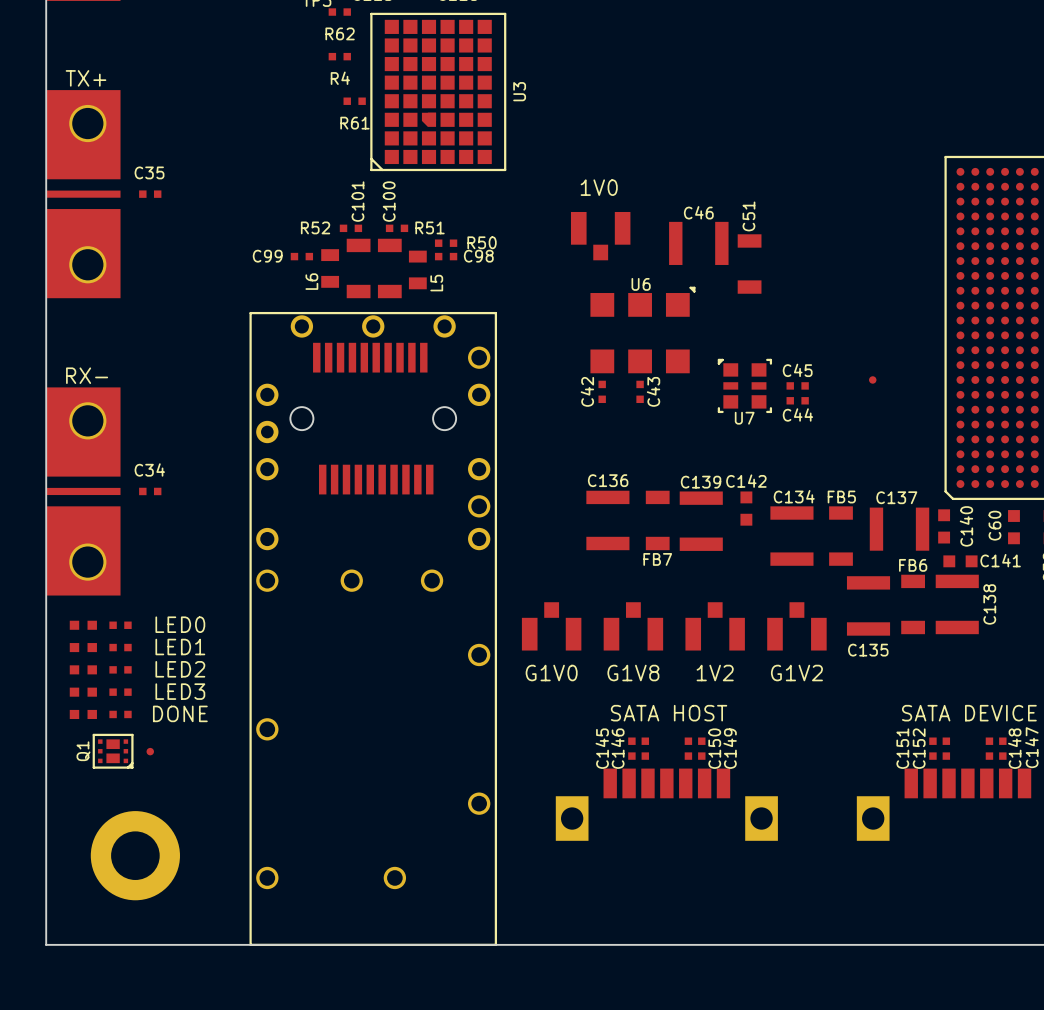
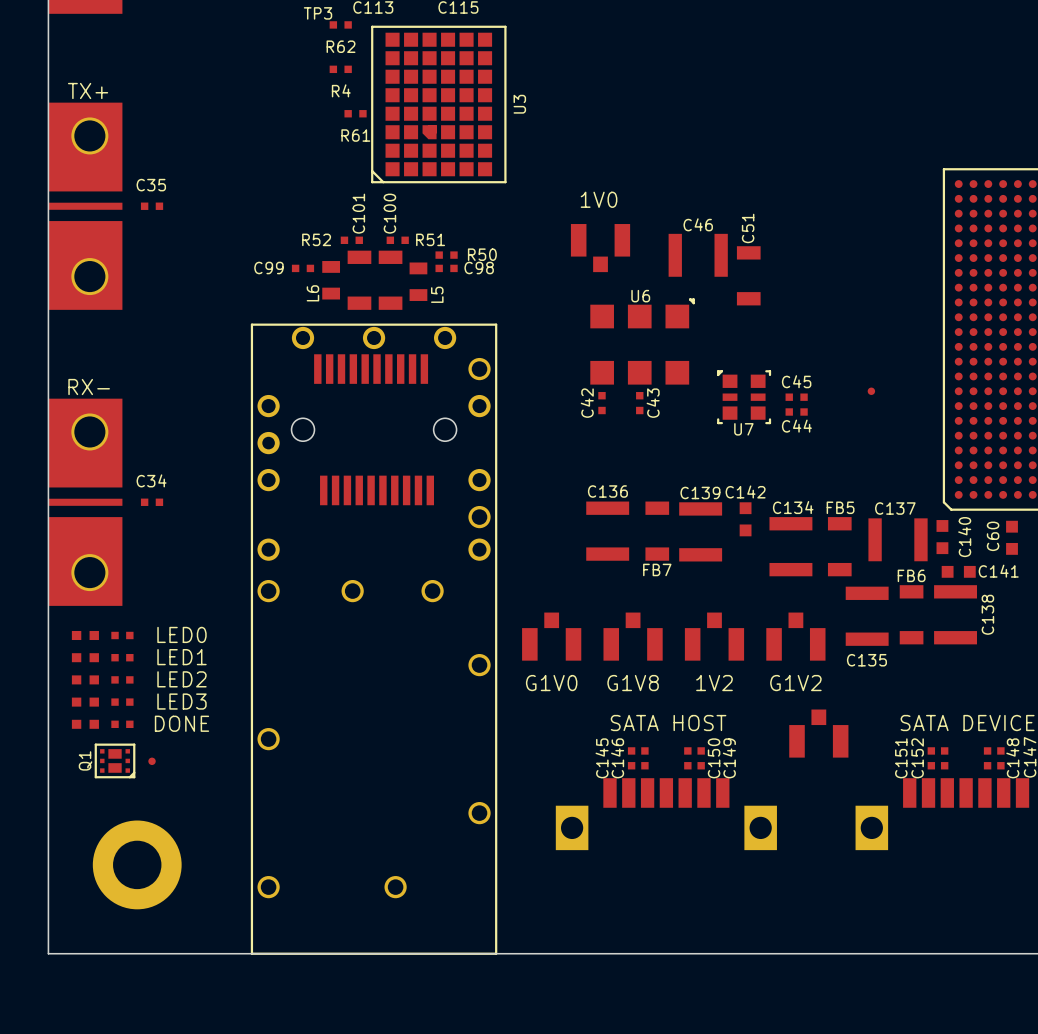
part: none -> (818, 733)

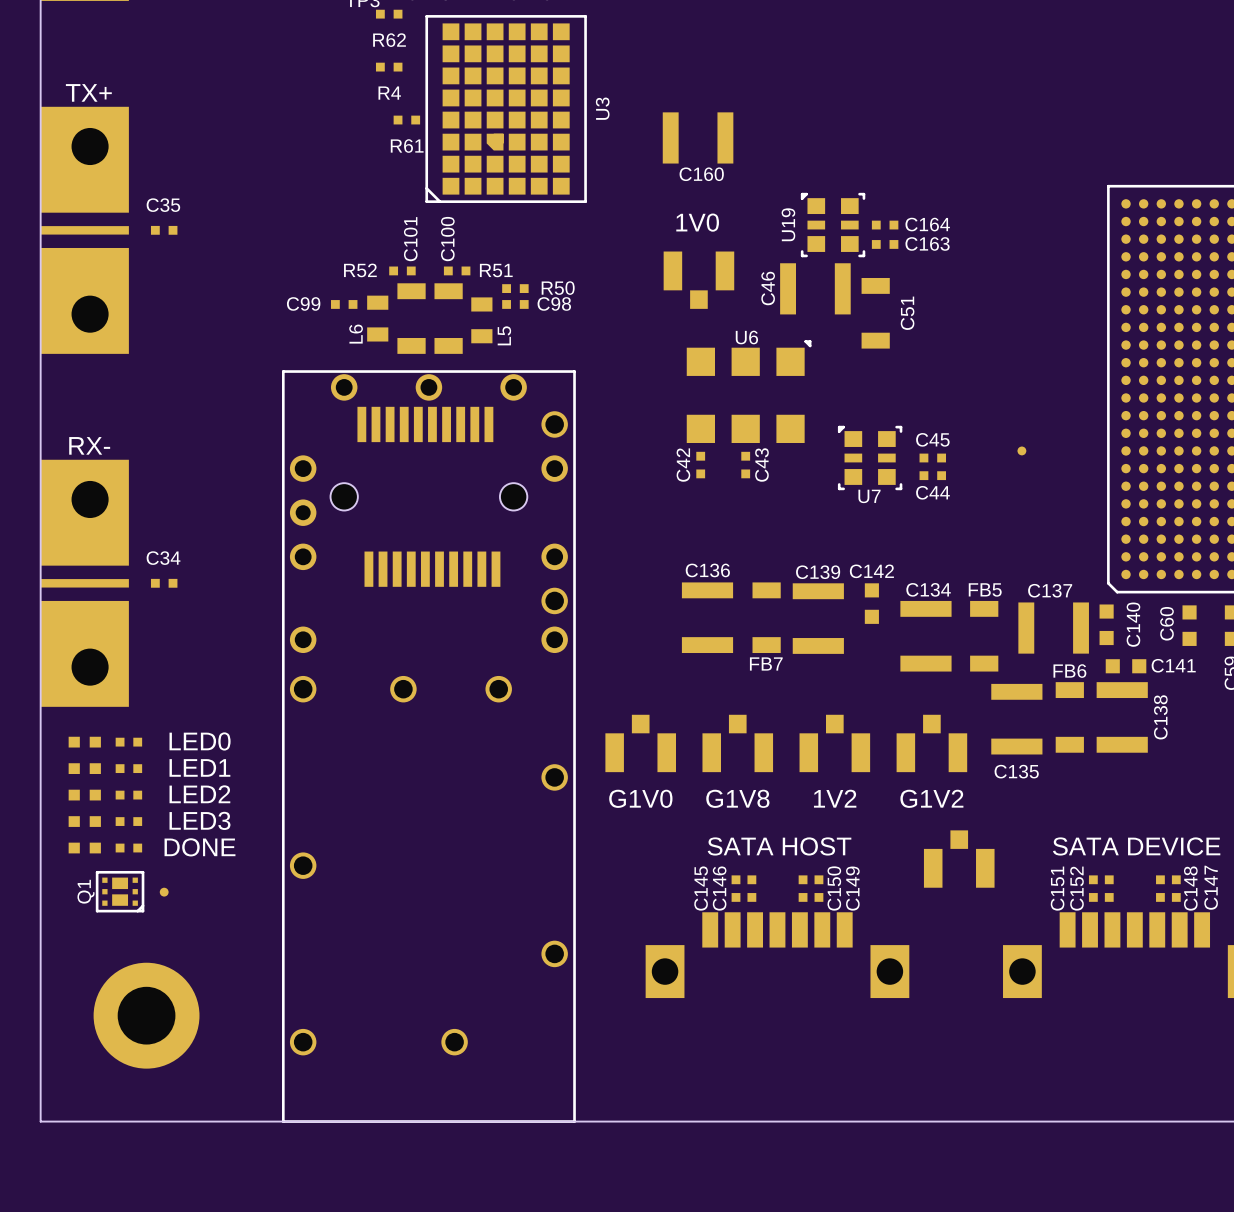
C160: none -> (698, 137)
U19: none -> (833, 225)
C164: none -> (885, 225)
C163: none -> (885, 244)
C46 name rotation: 0° (698, 224) -> 90° counterclockwise (768, 288)
C46 name position: C46 (698, 224) -> C46 (768, 288)
C51 name position: C51 (748, 228) -> C51 (907, 313)

